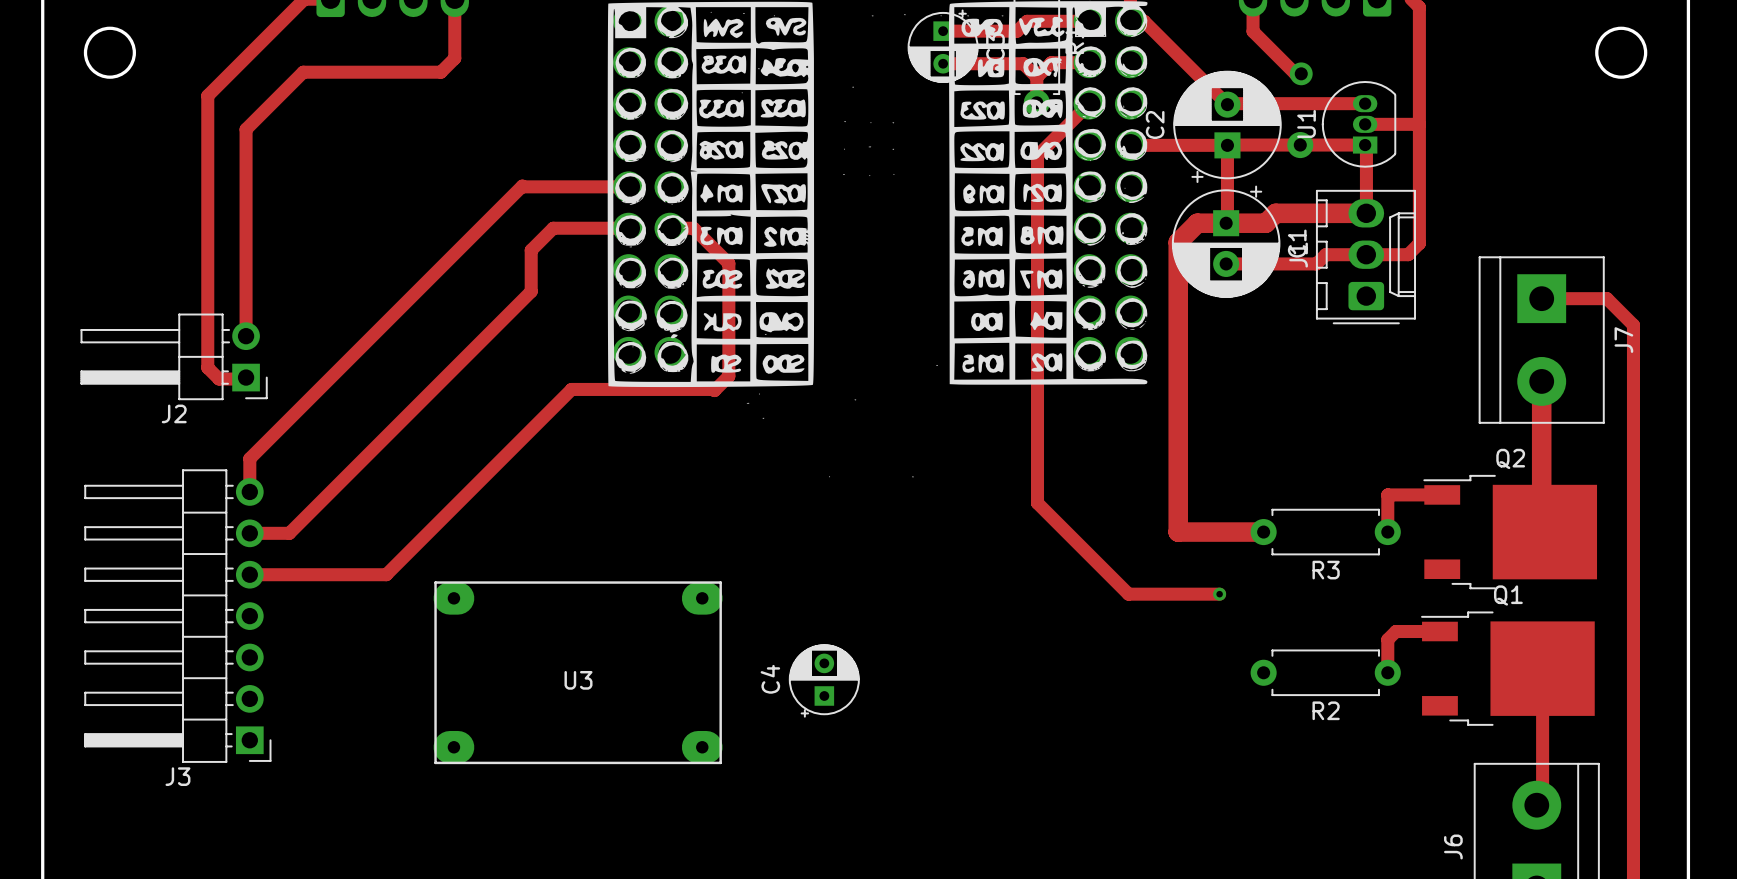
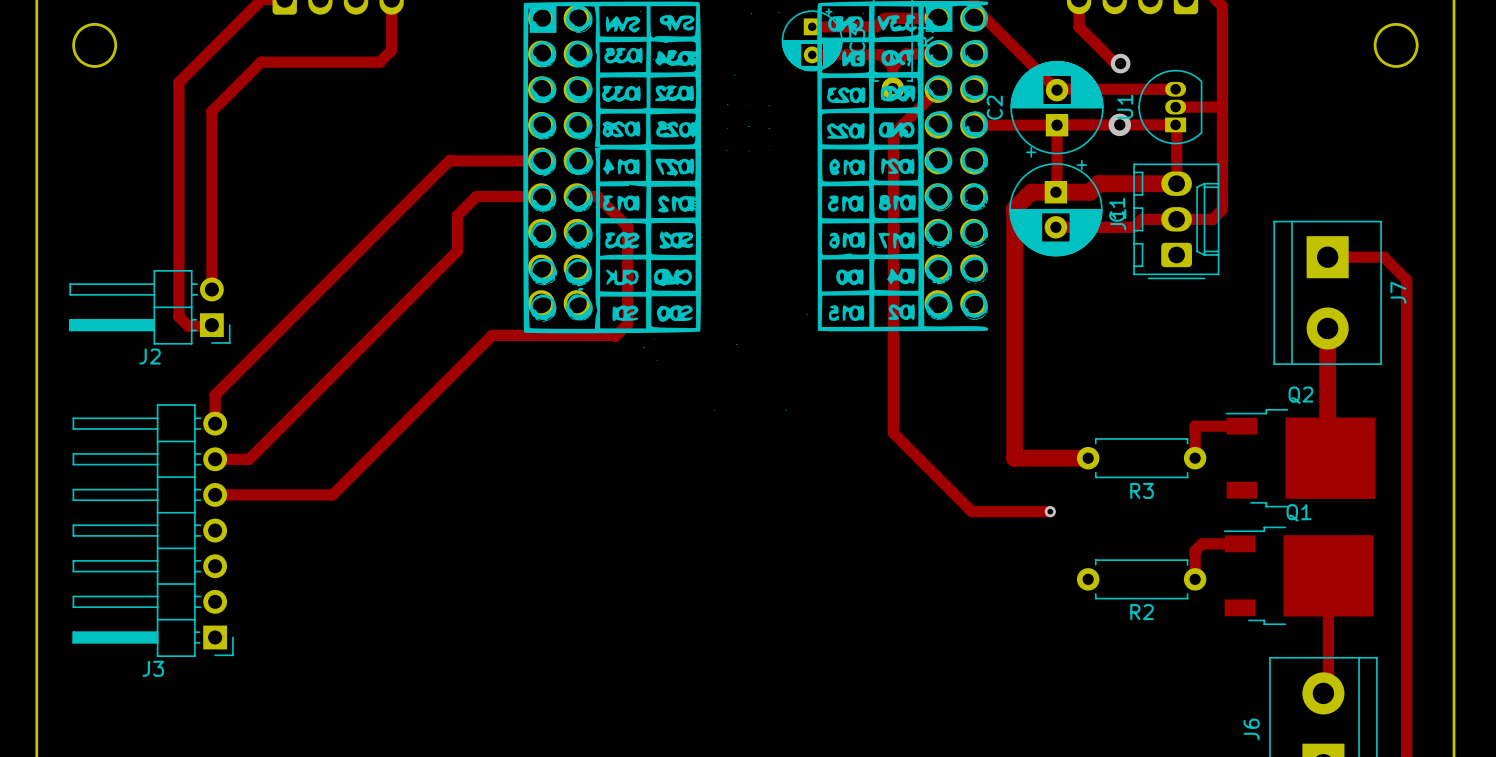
U3: (578, 672) -> none
C4: (824, 680) -> none

